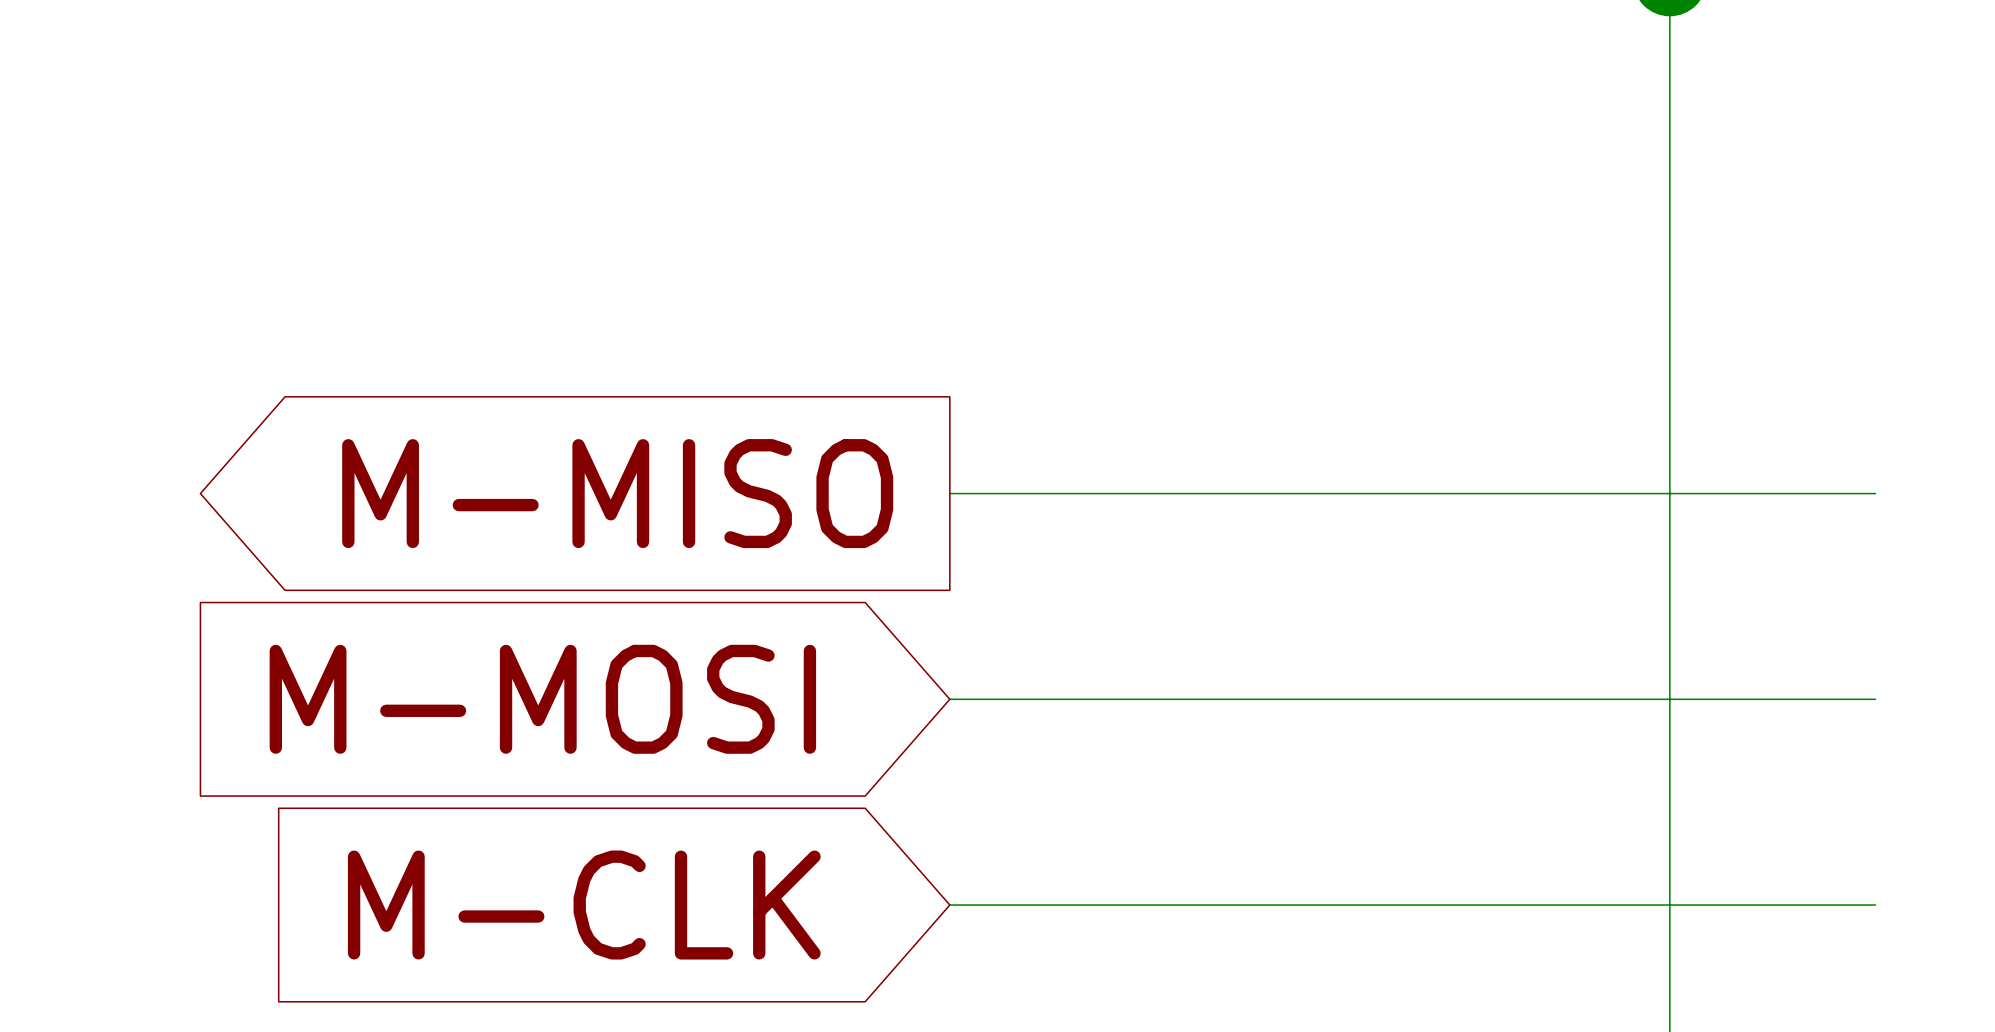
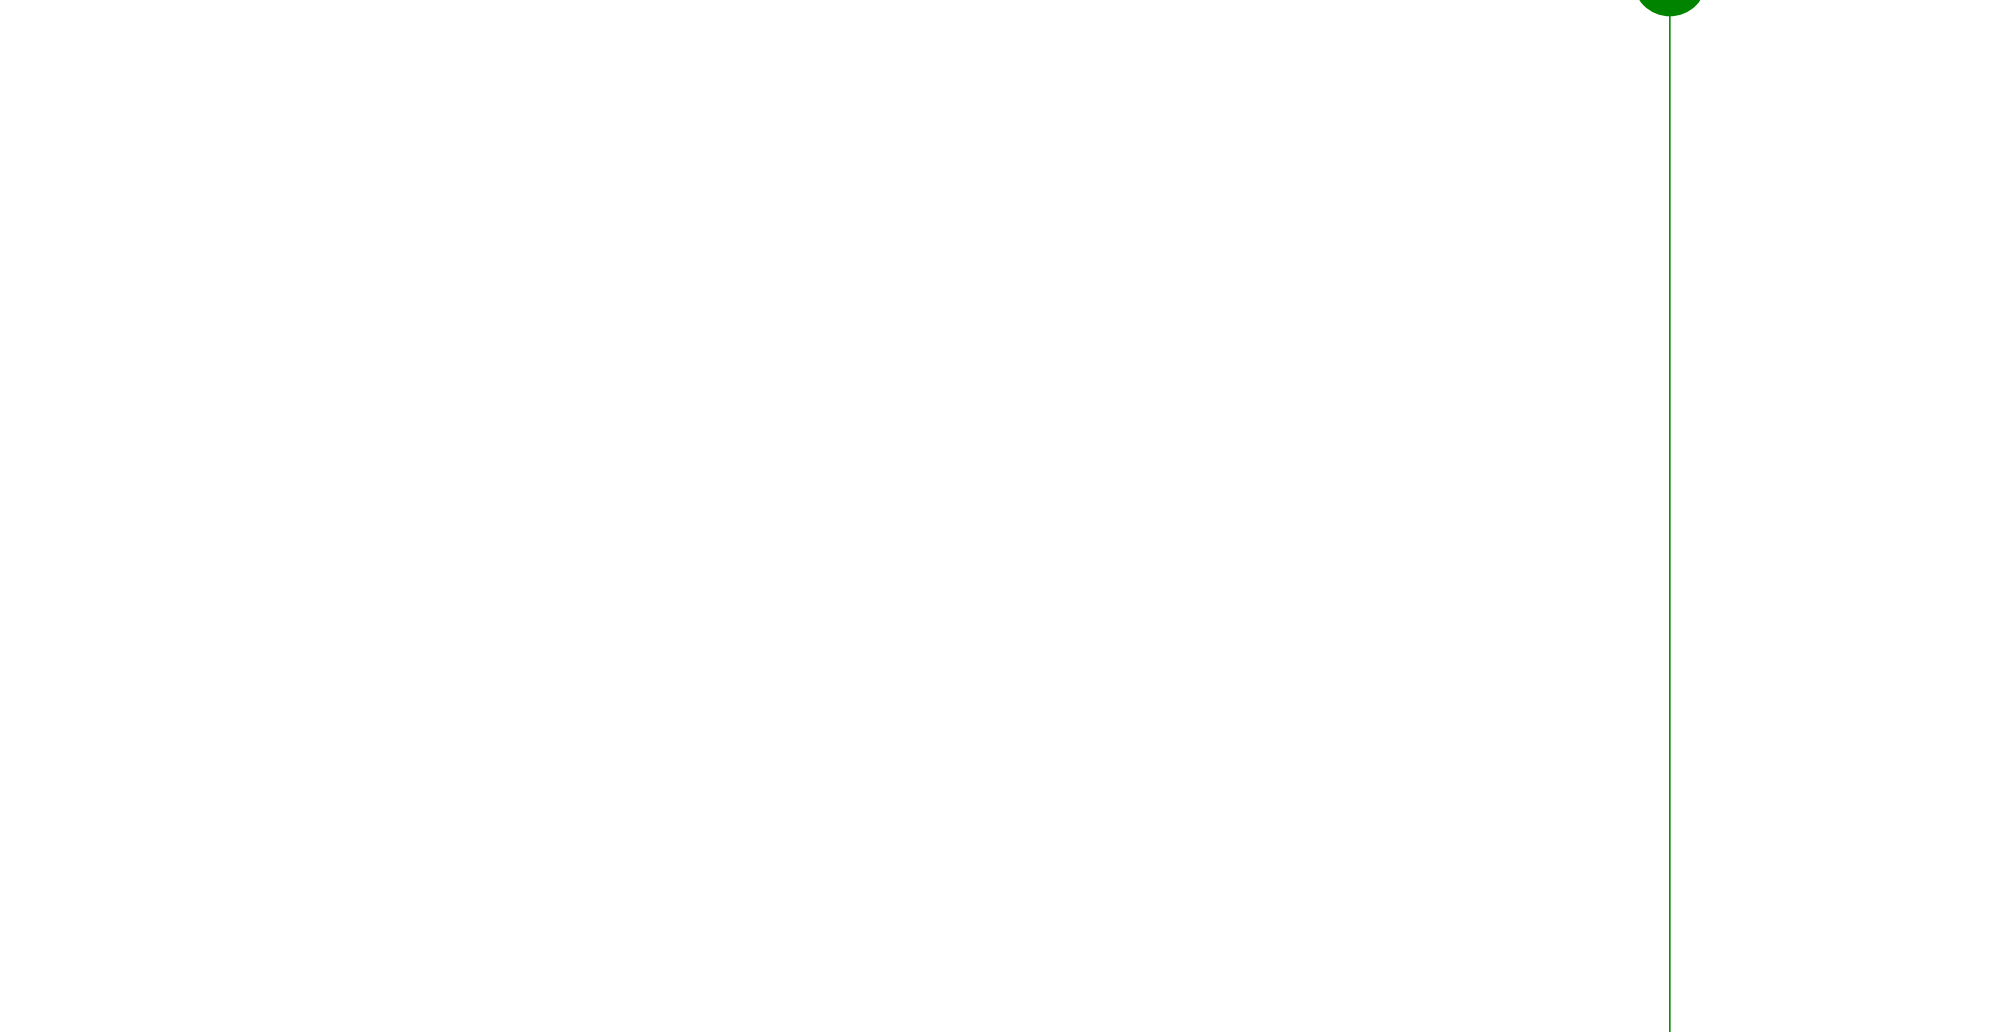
global label: M-MISO (617, 493) -> none
wire: (949, 493) (1875, 493) -> none
global label: M-MOSI (542, 699) -> none
wire: (949, 699) (1875, 699) -> none
global label: M-CLK (584, 905) -> none
wire: (949, 905) (1875, 905) -> none

